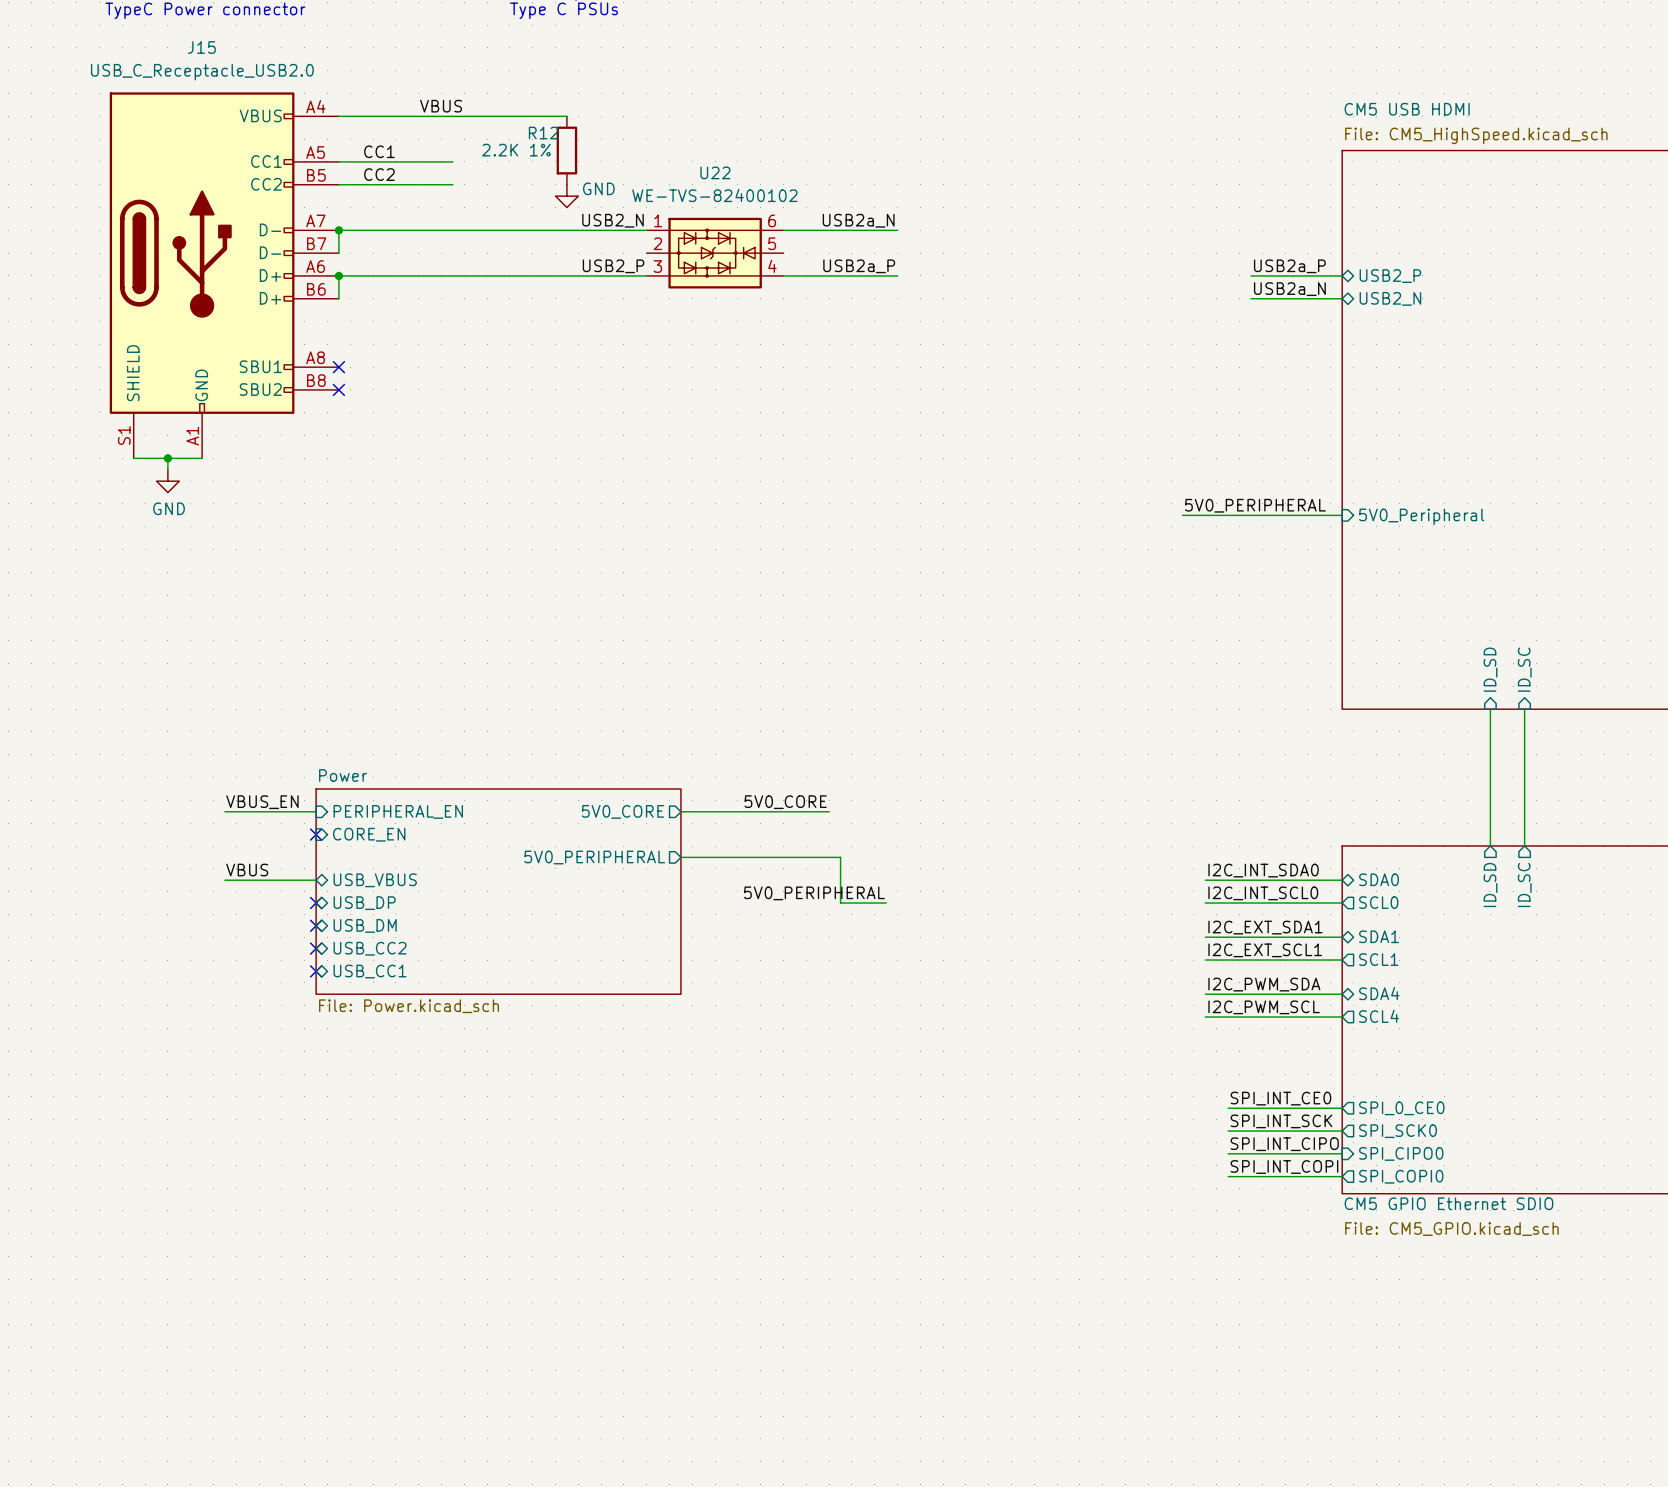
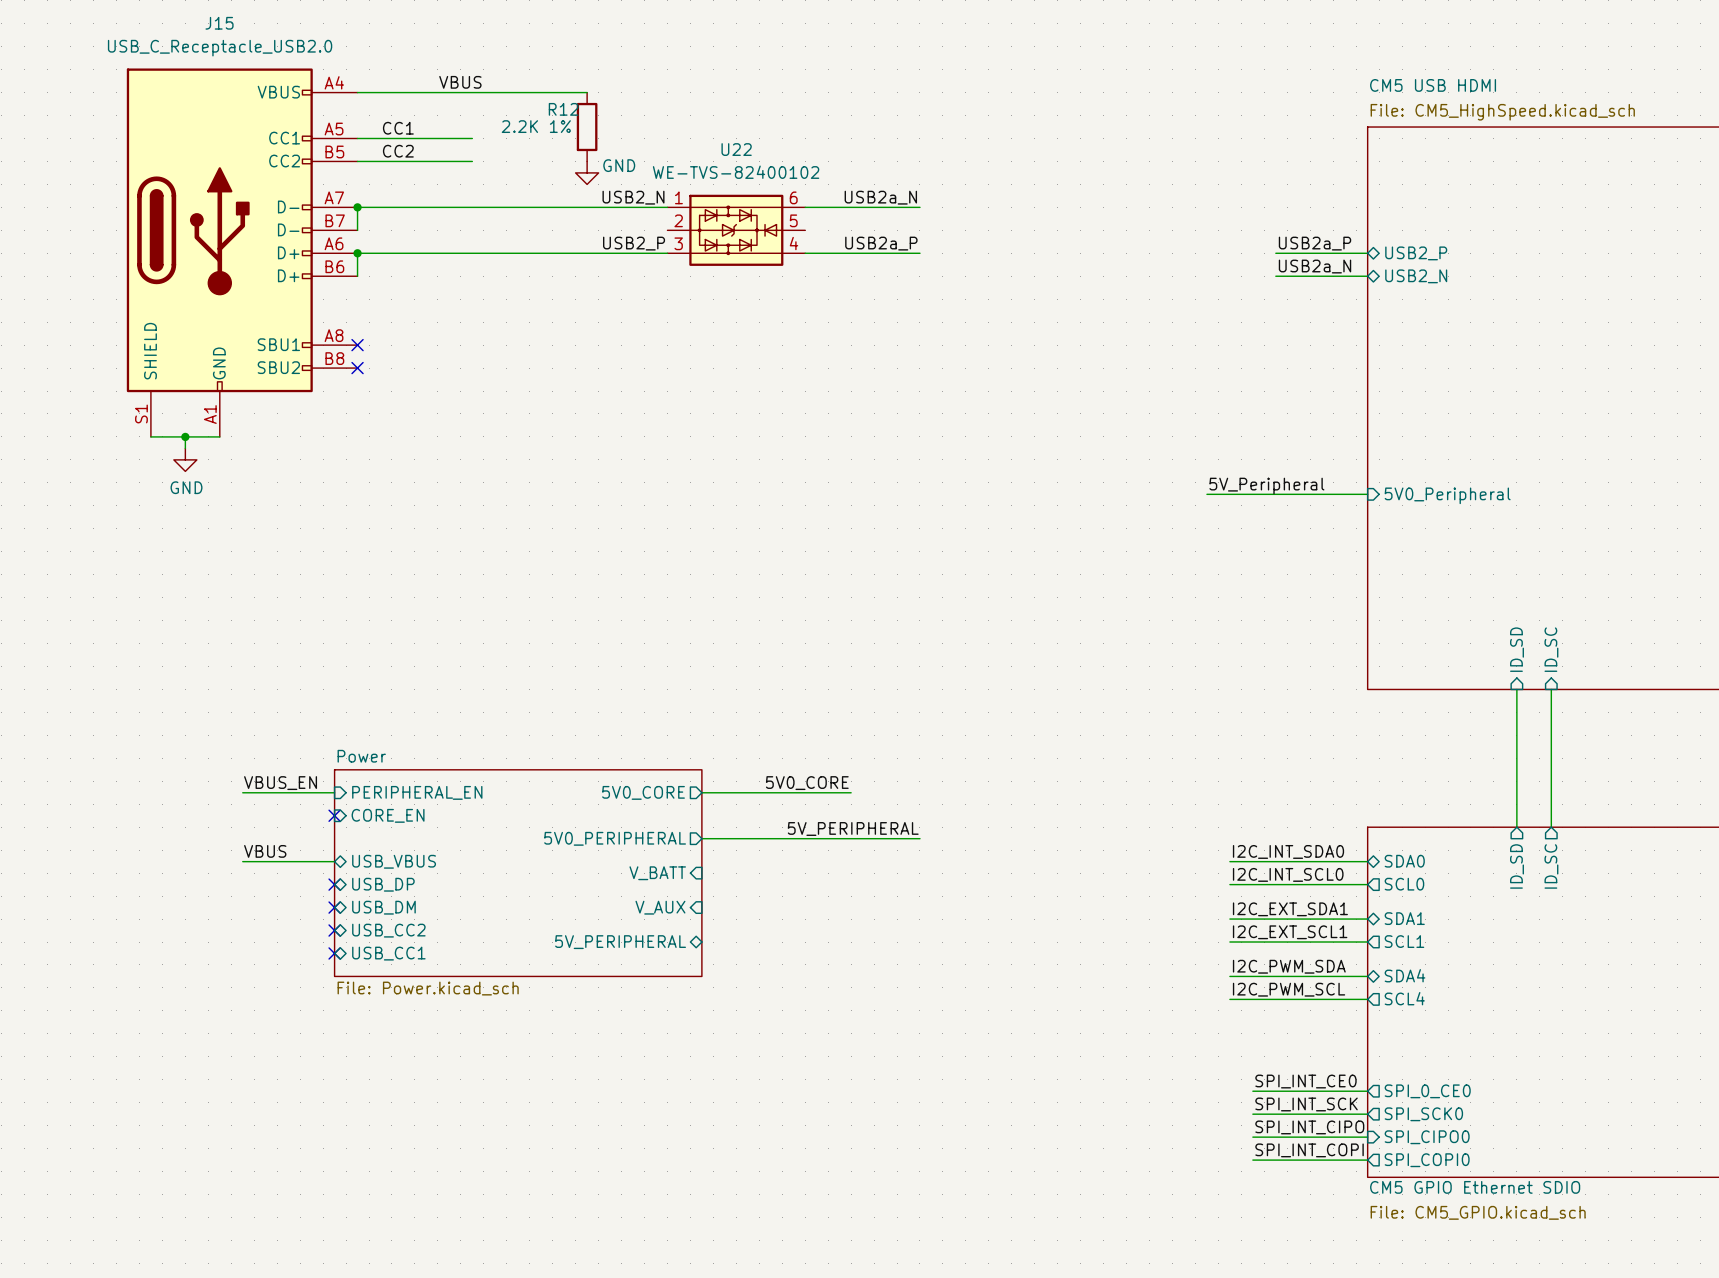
label: 5V0_PERIPHERAL (1255, 505) -> 5V_Peripheral (1266, 486)
label: none -> 5V_PERIPHERAL (853, 828)
wire: (840, 857) (840, 903) (886, 903) -> (862, 838) (919, 838)
sheet pin: none -> V_BATT (657, 873)
label: 5V0_PERIPHERAL (814, 893) -> none
sheet pin: none -> V_AUX (660, 907)
sheet pin: none -> 5V_PERIPHERAL (620, 942)

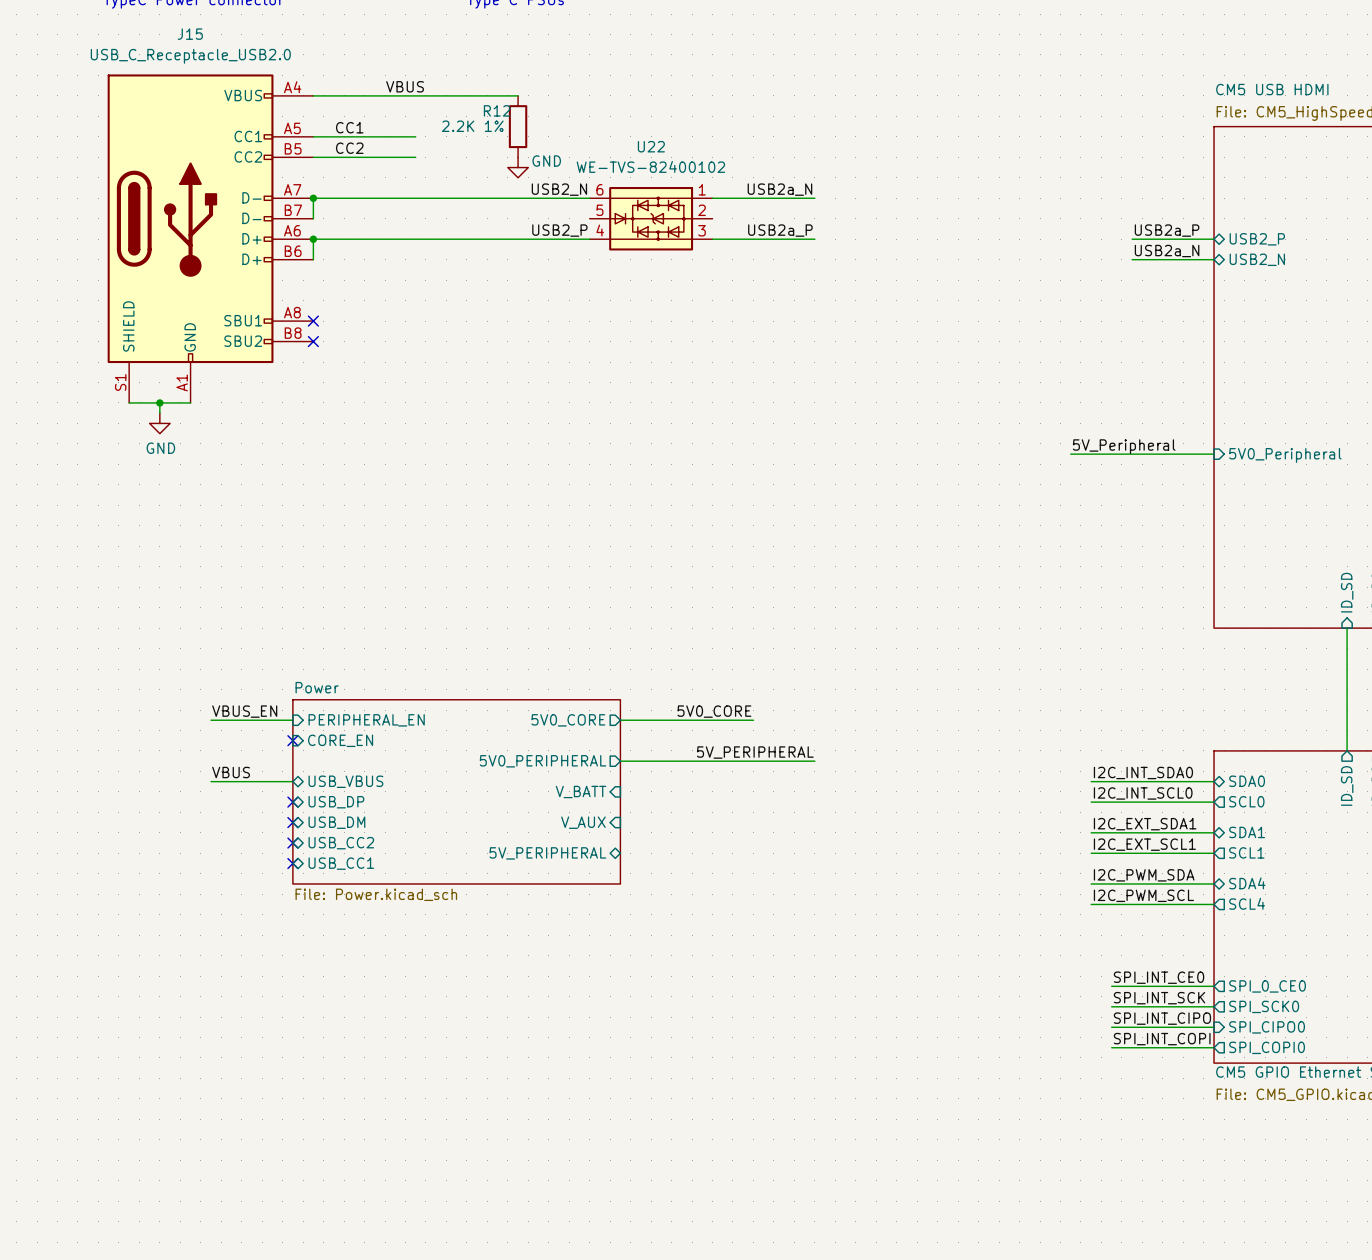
U22 flip: as is (736, 230) -> left-right (651, 218)

